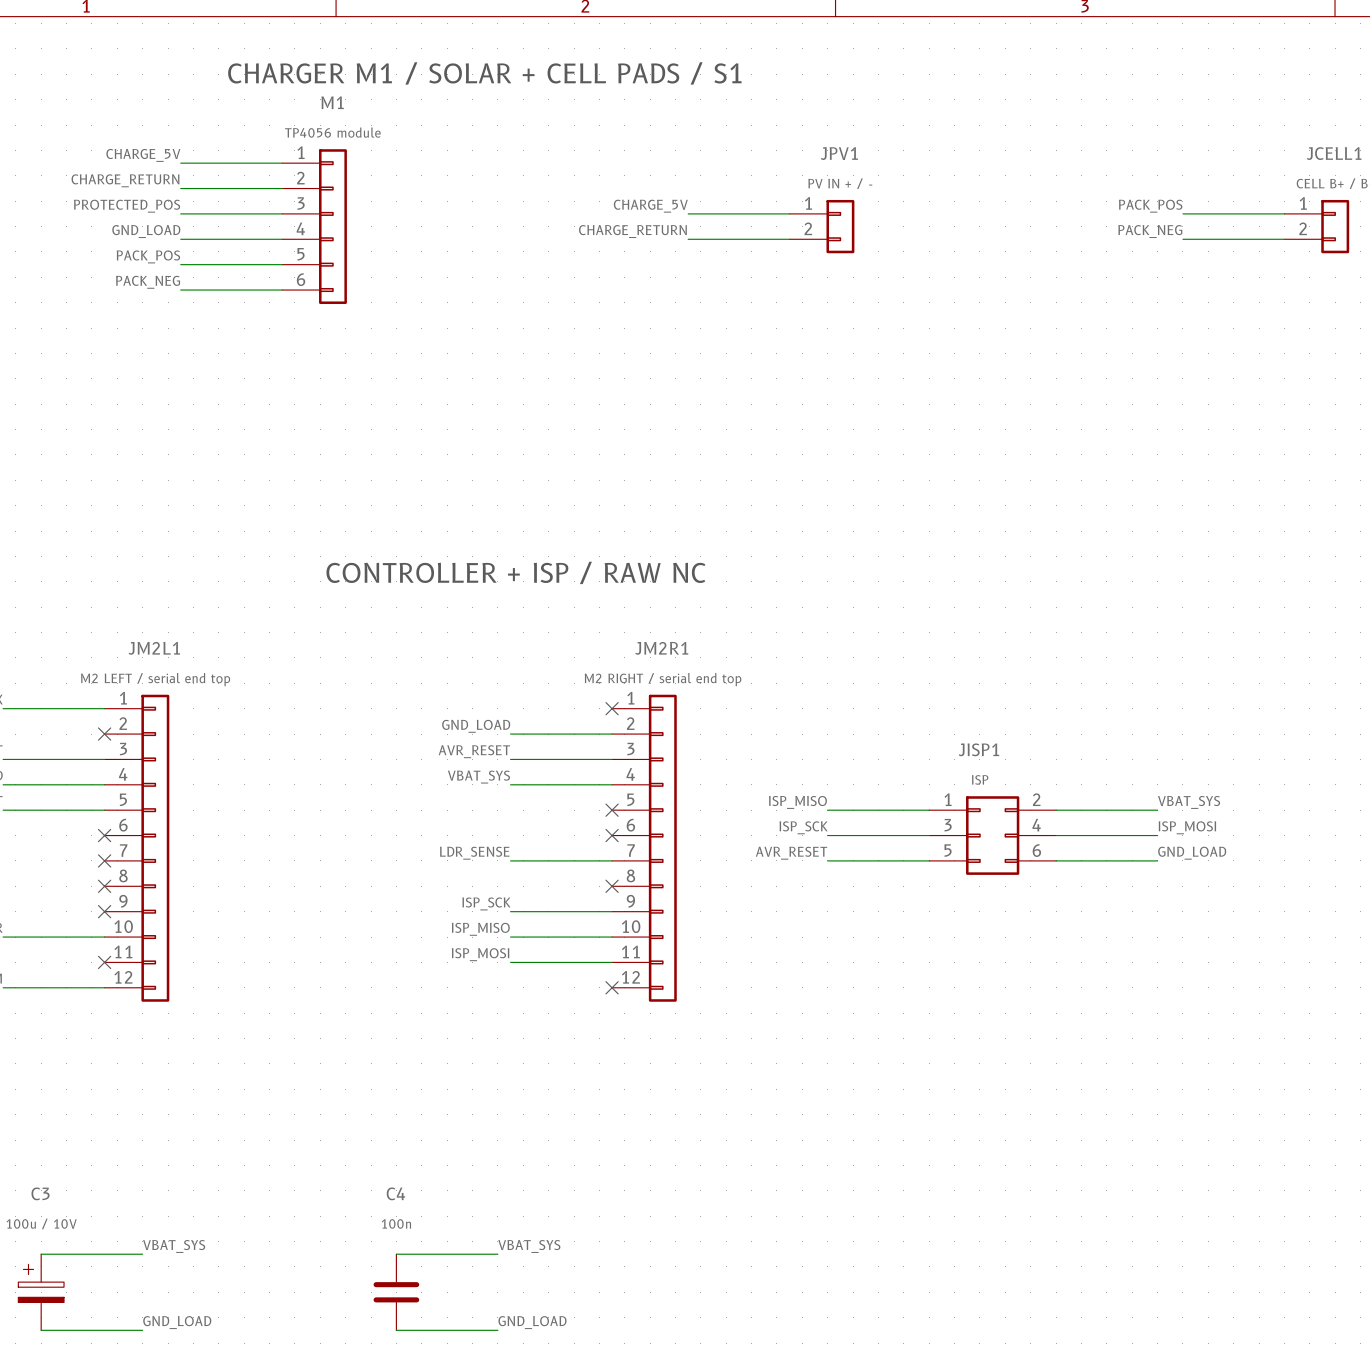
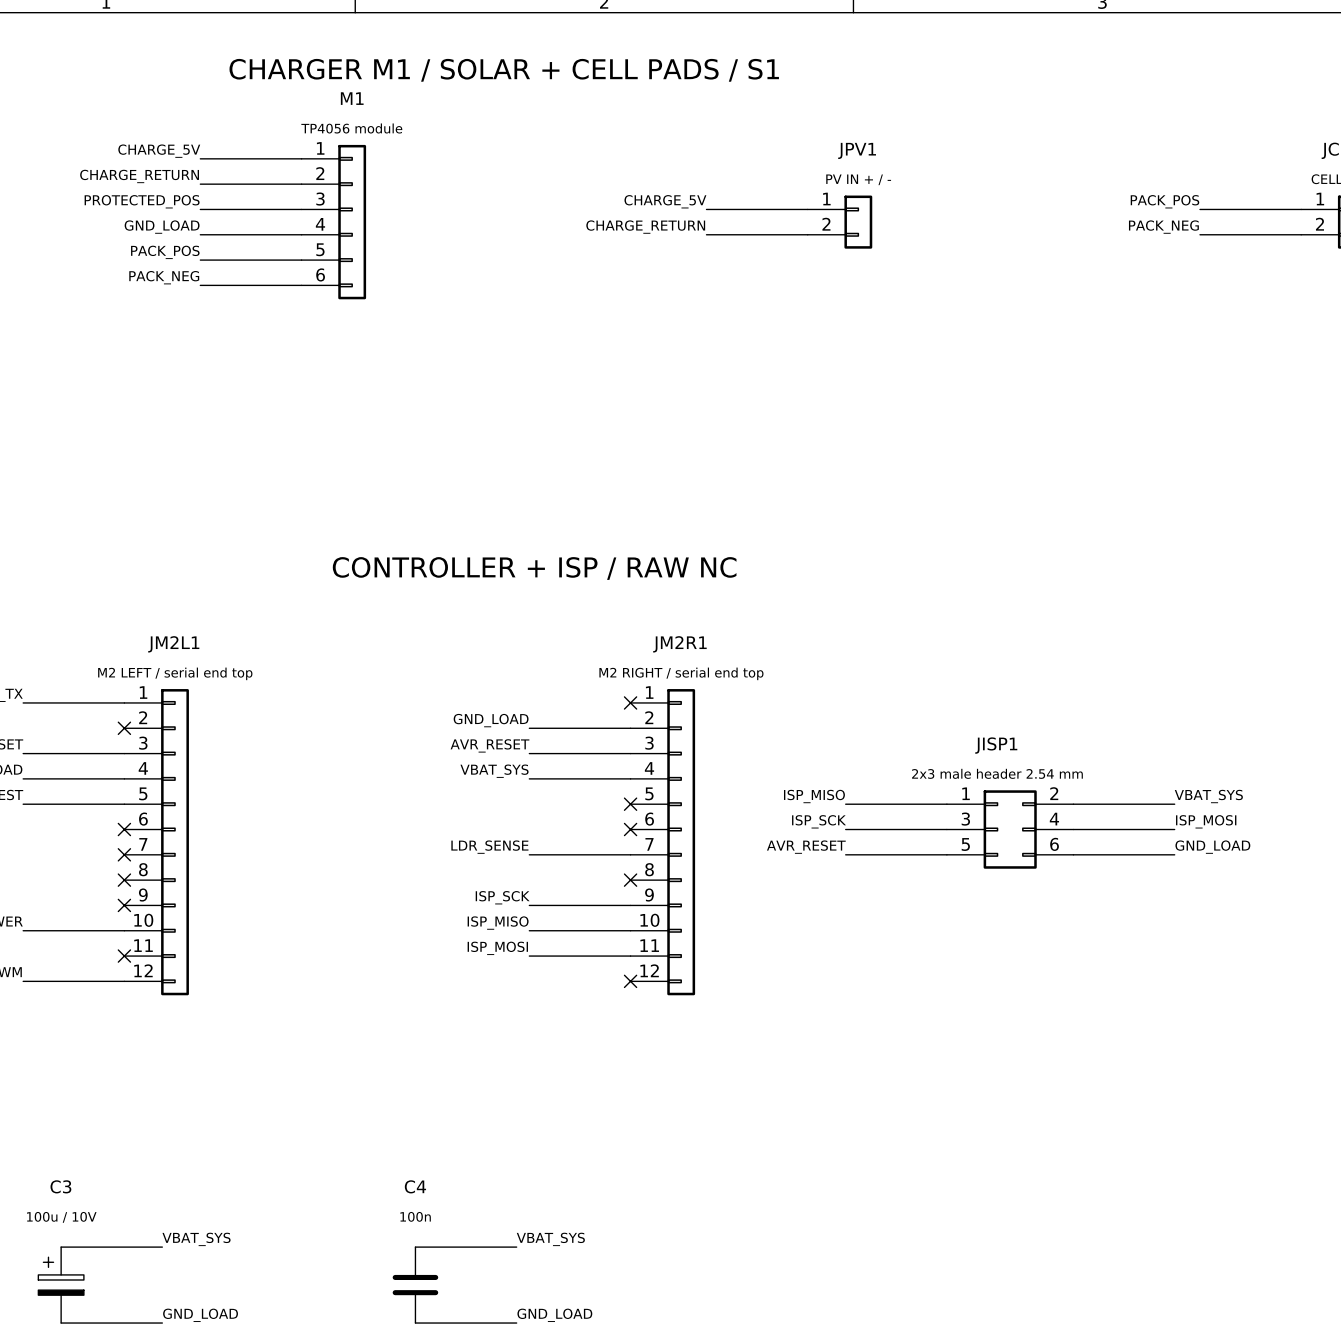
JISP1 value: ISP (980, 779) -> 2x3 male header 2.54 mm (997, 773)

